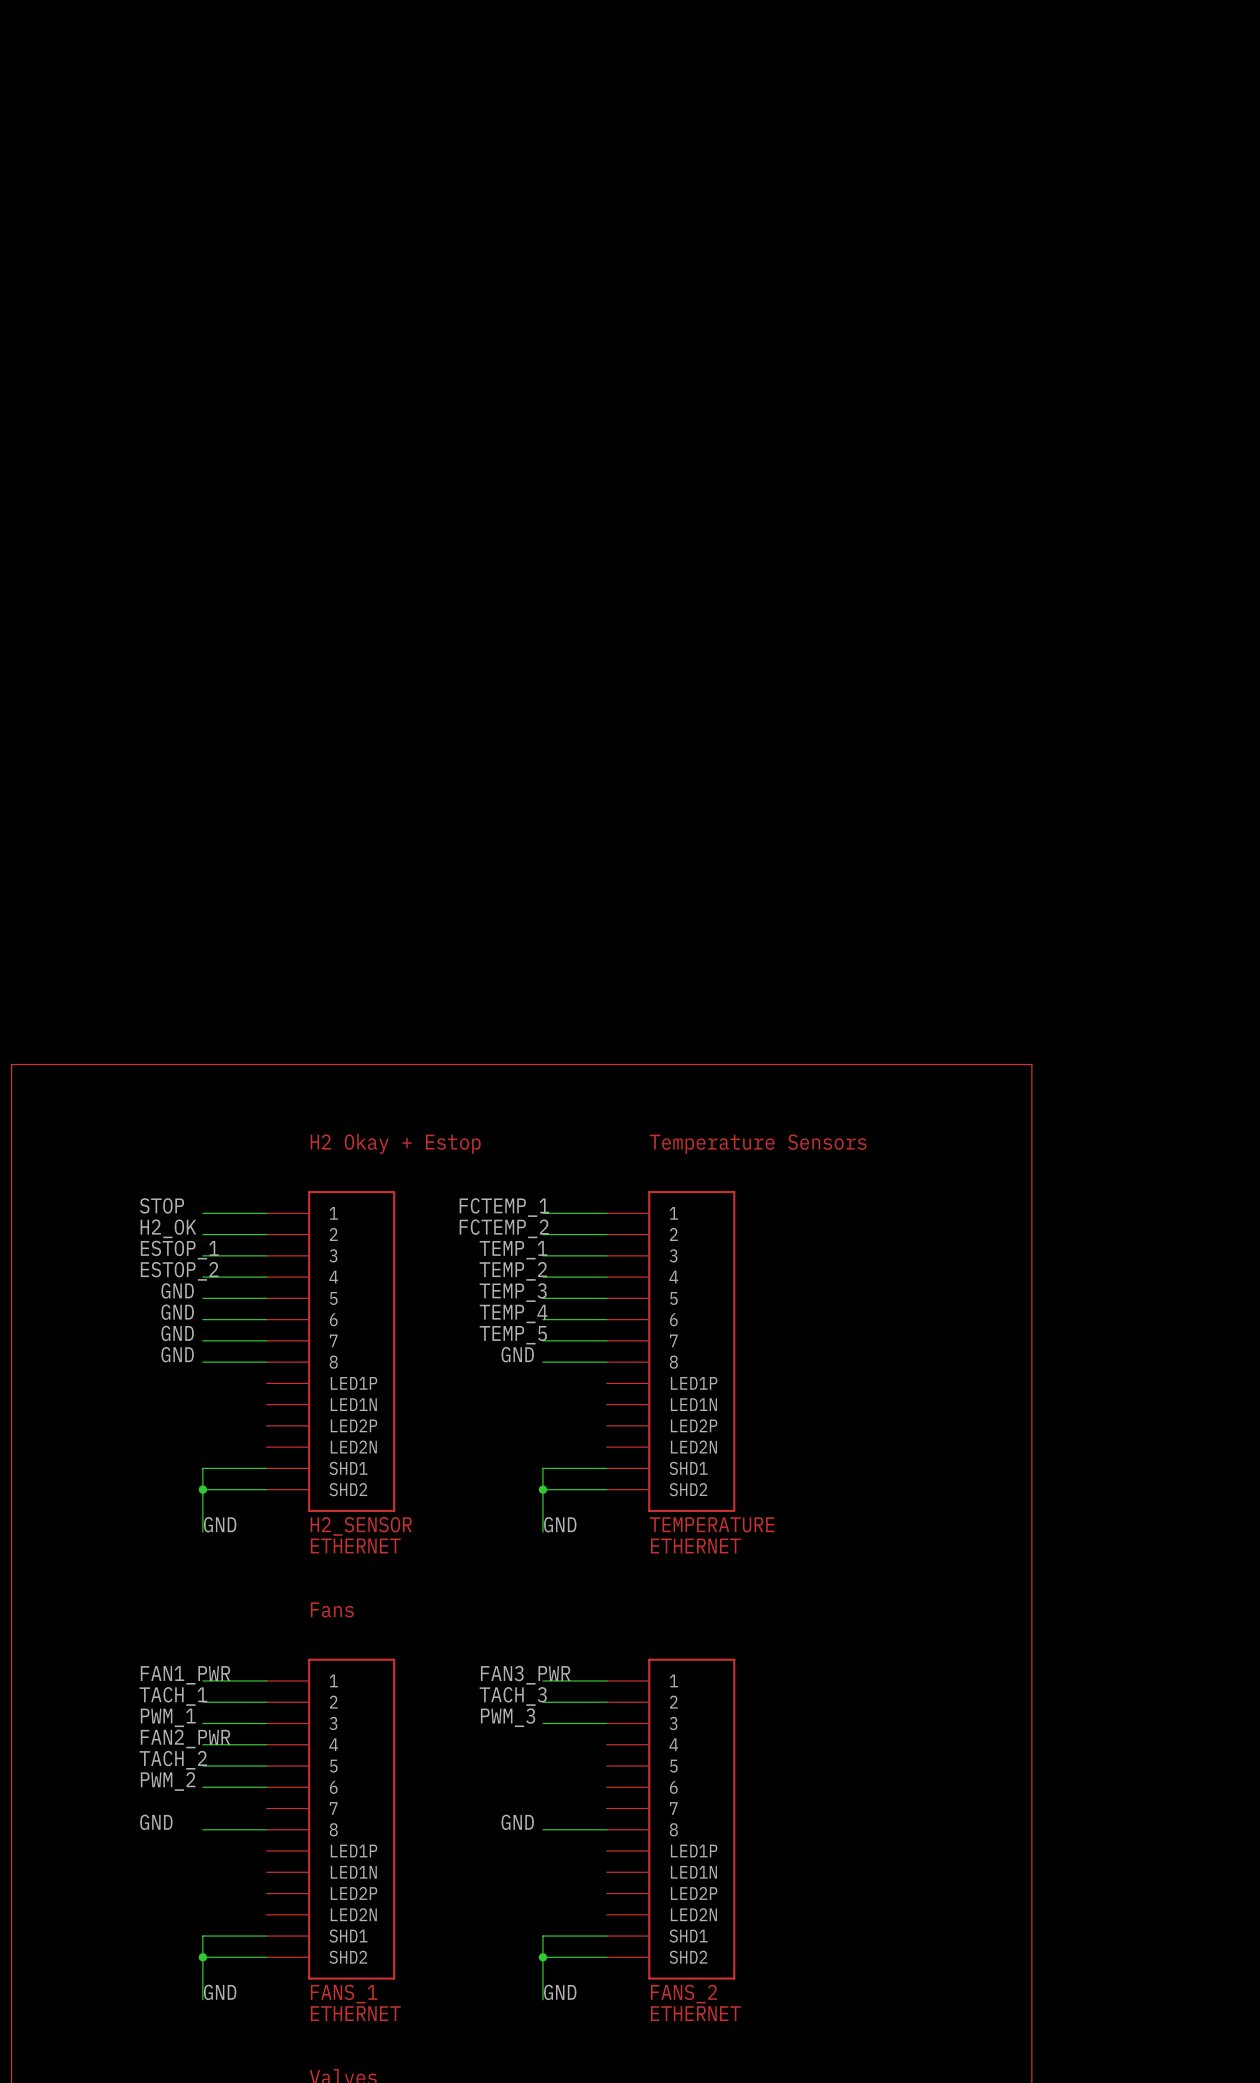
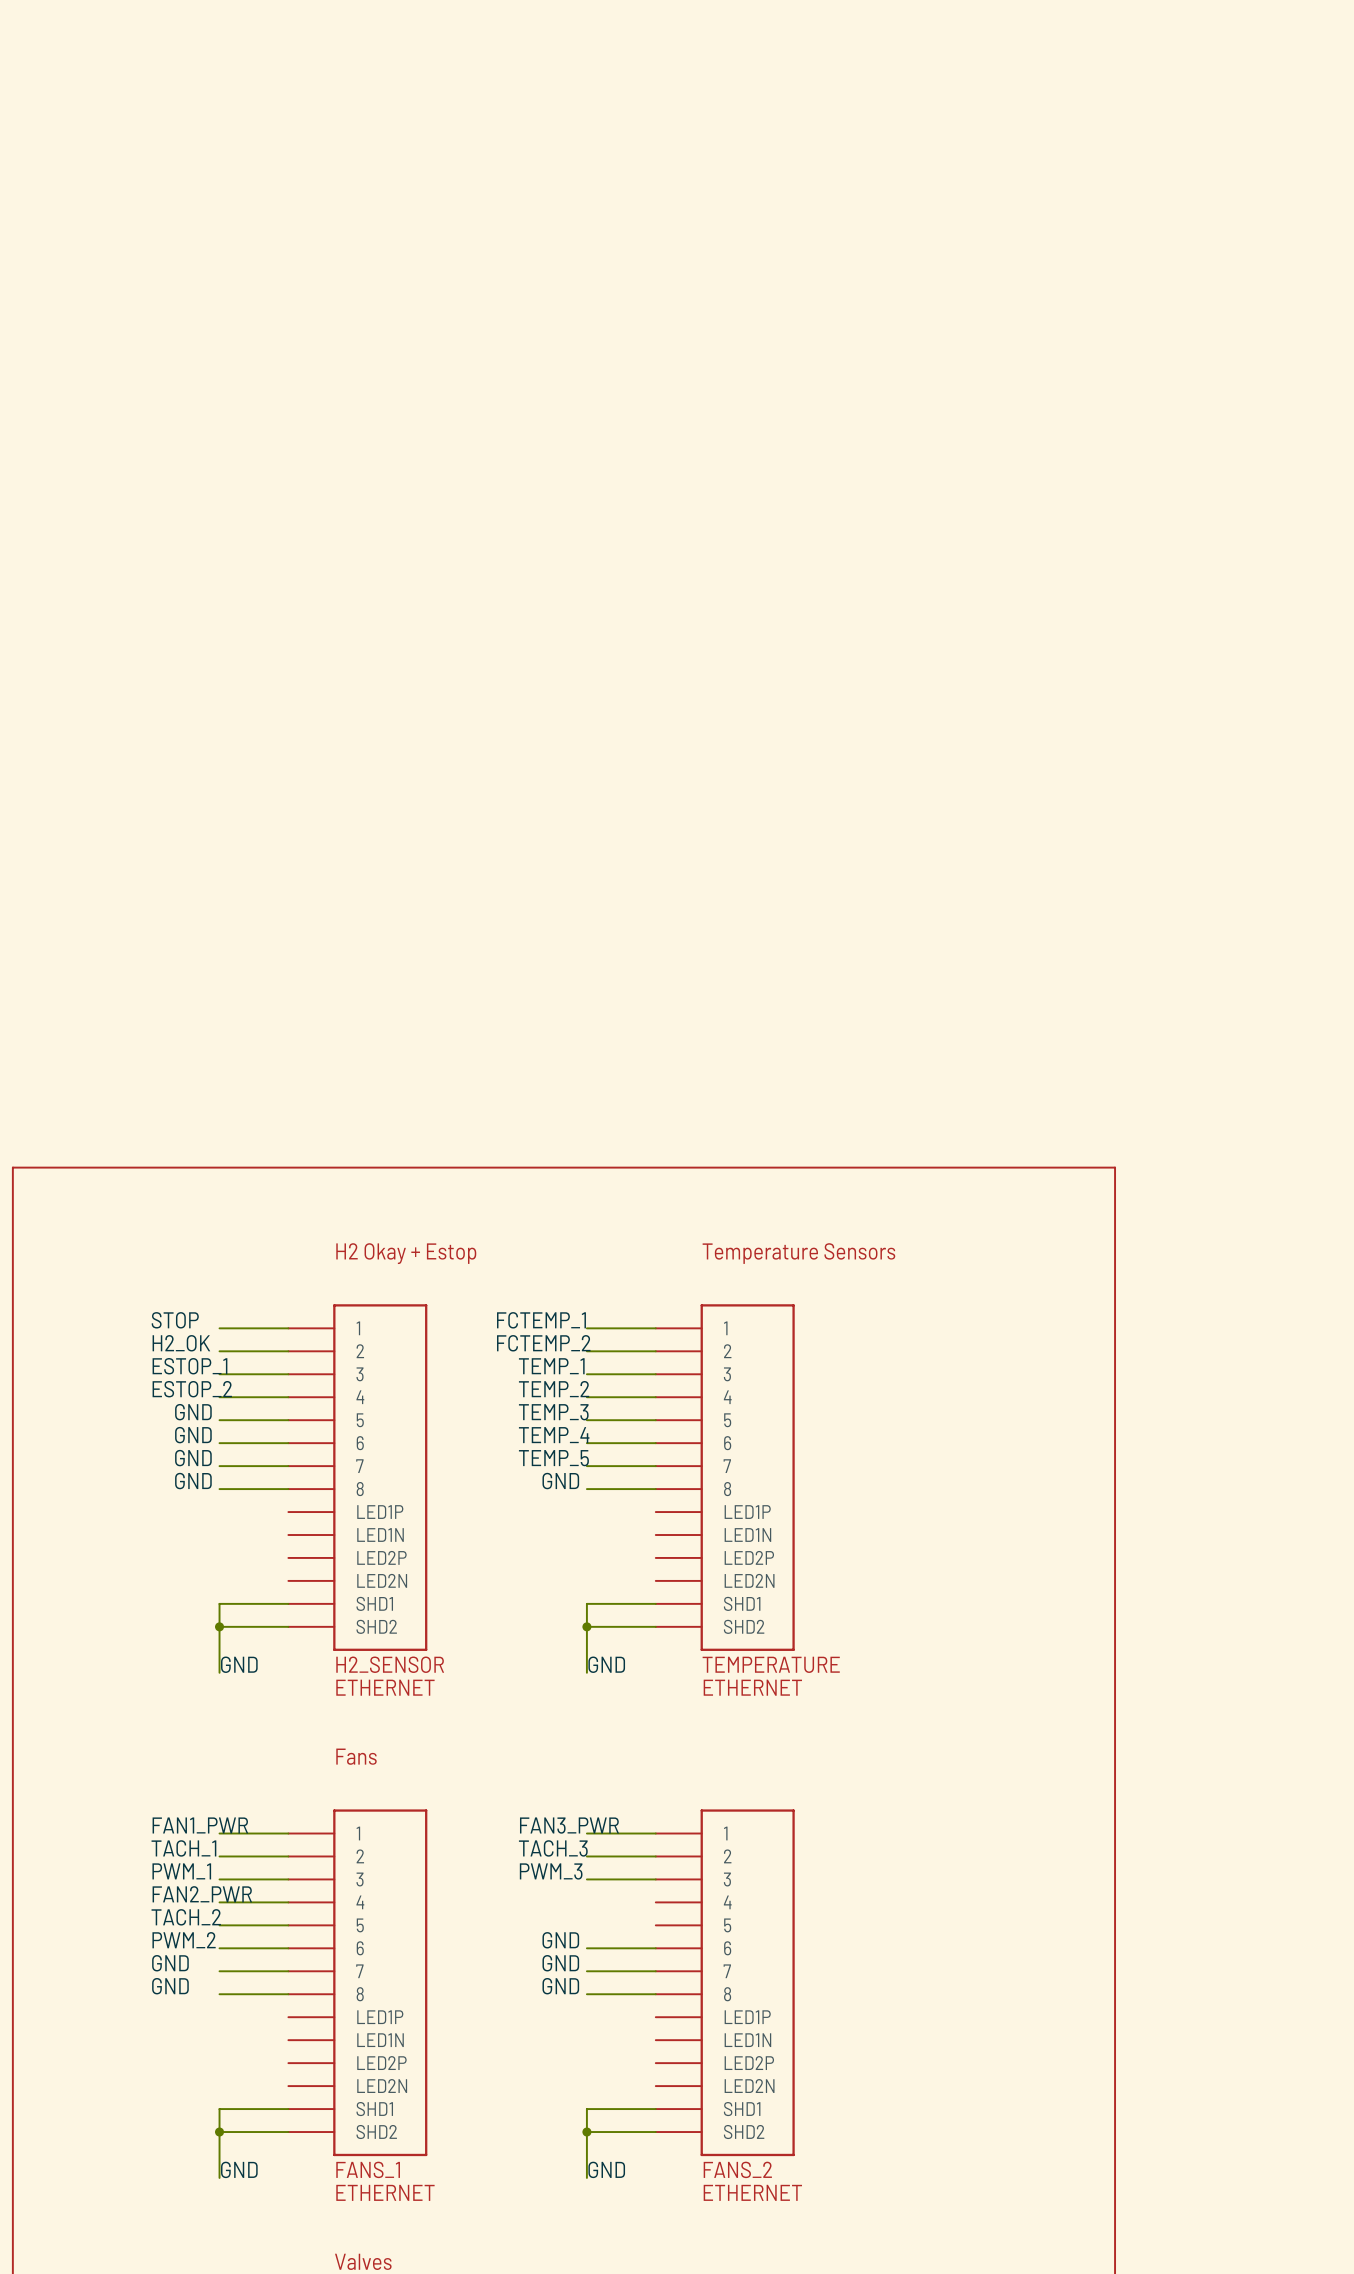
label: none -> GND (560, 1940)
wire: none -> (586, 1948) (655, 1948)
label: none -> GND (170, 1963)
label: none -> GND (560, 1963)
wire: none -> (219, 1971) (288, 1971)
wire: none -> (586, 1971) (655, 1971)

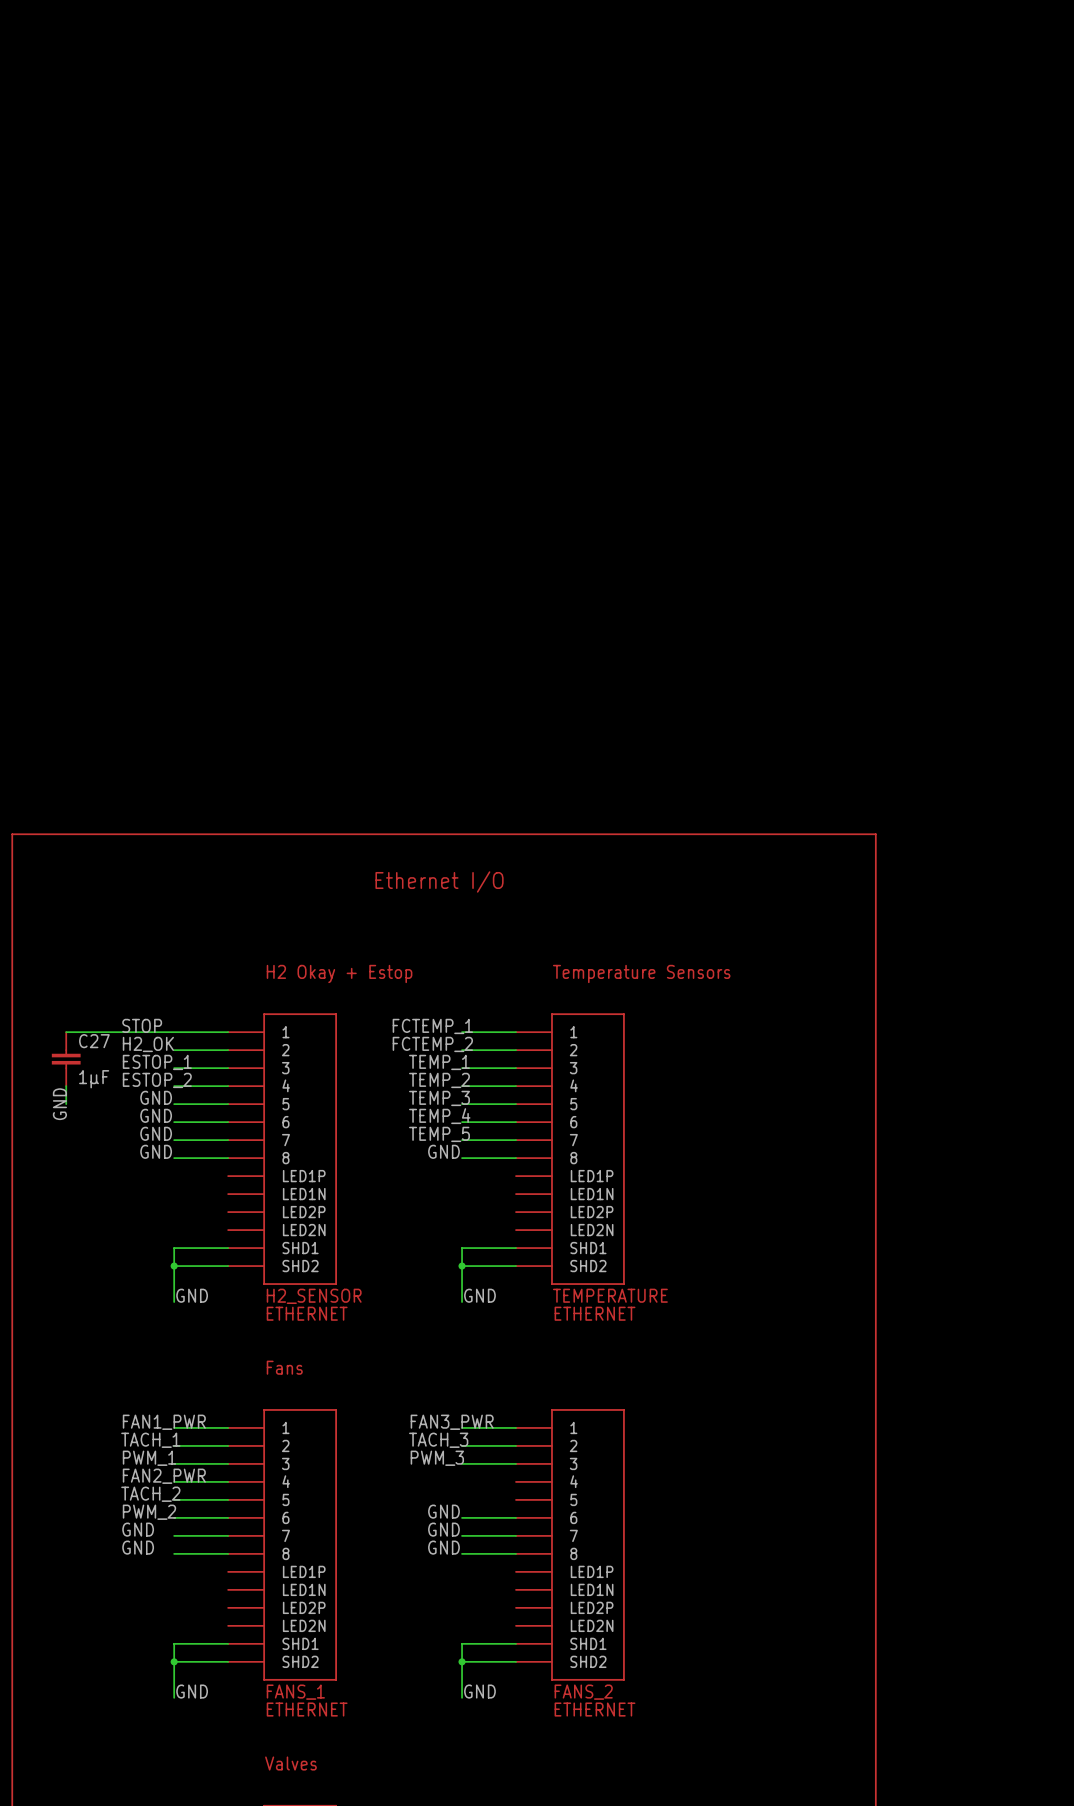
text: none -> Ethernet I/O (439, 881)
line: (12, 1167) (1115, 1167) -> (12, 906) (12, 834) (875, 834) (875, 906)
wire: none -> (66, 1032) (174, 1032)
C27: none -> 1µF (66, 1059)
wire: none -> (66, 1086) (66, 1104)
label: none -> GND (59, 1104)

